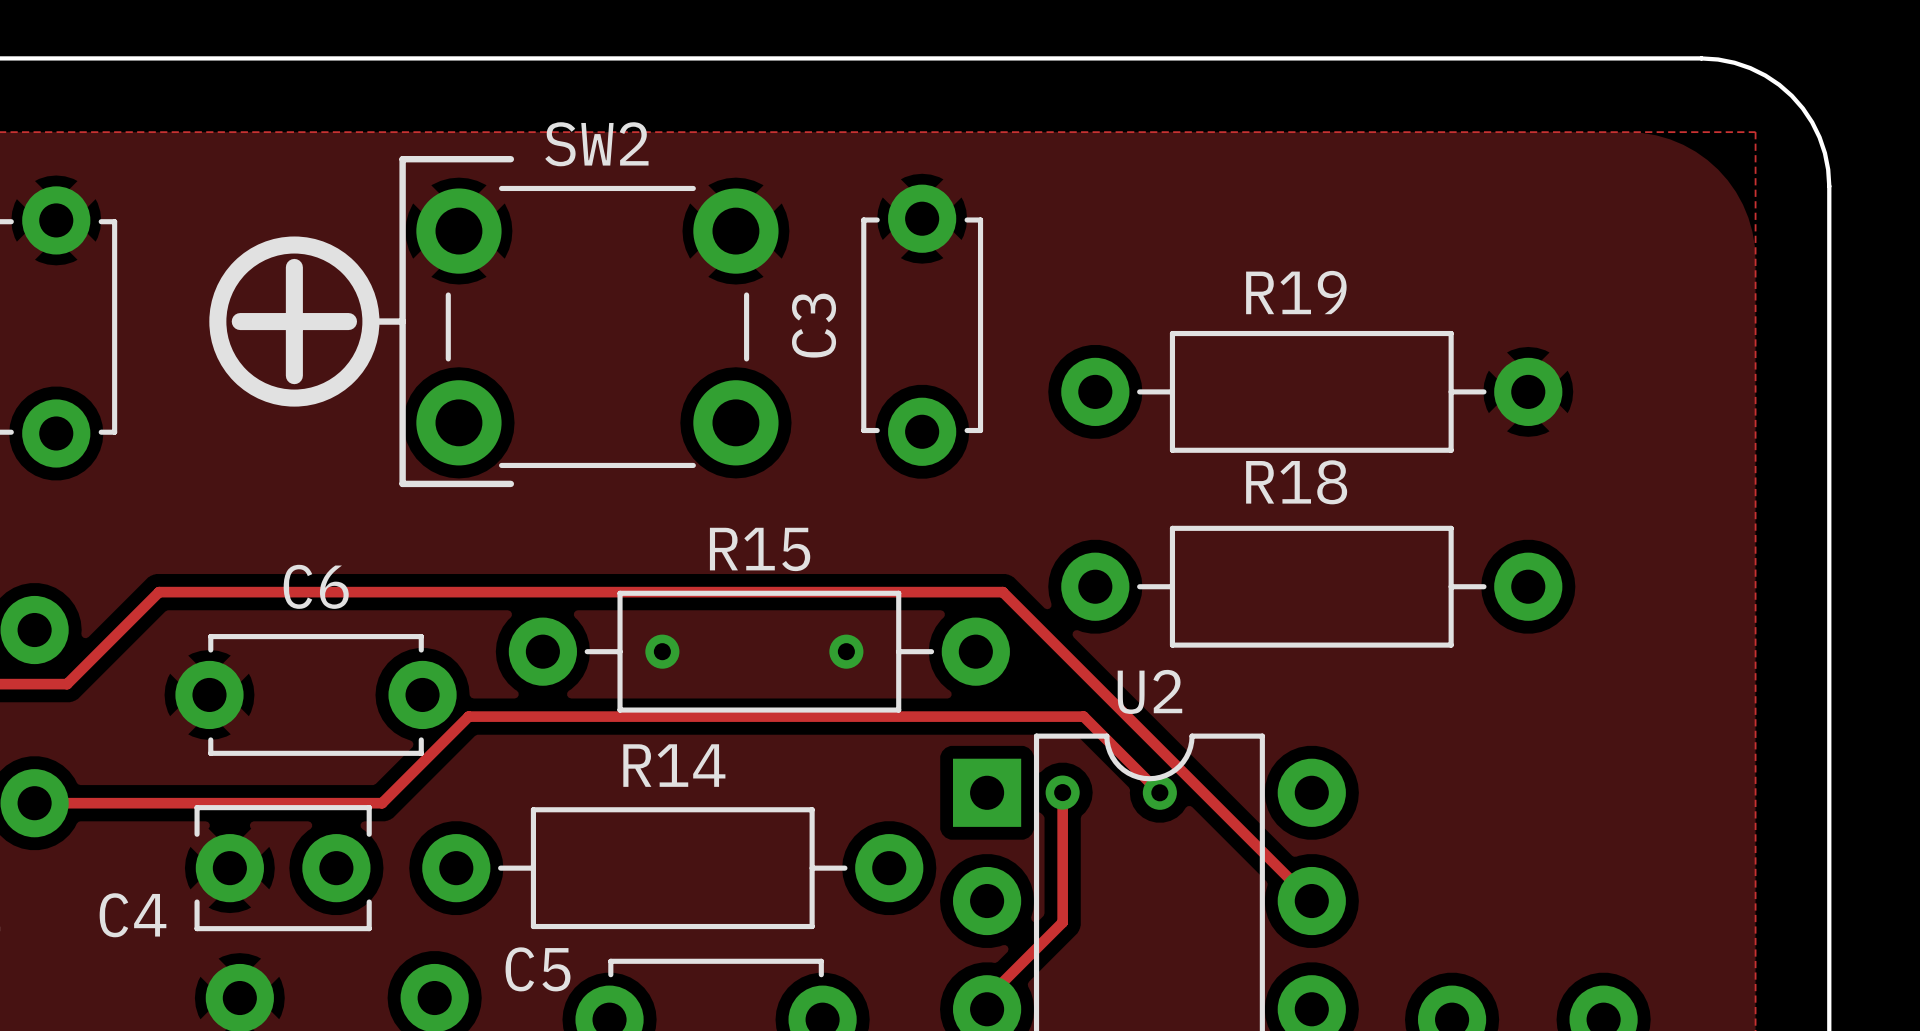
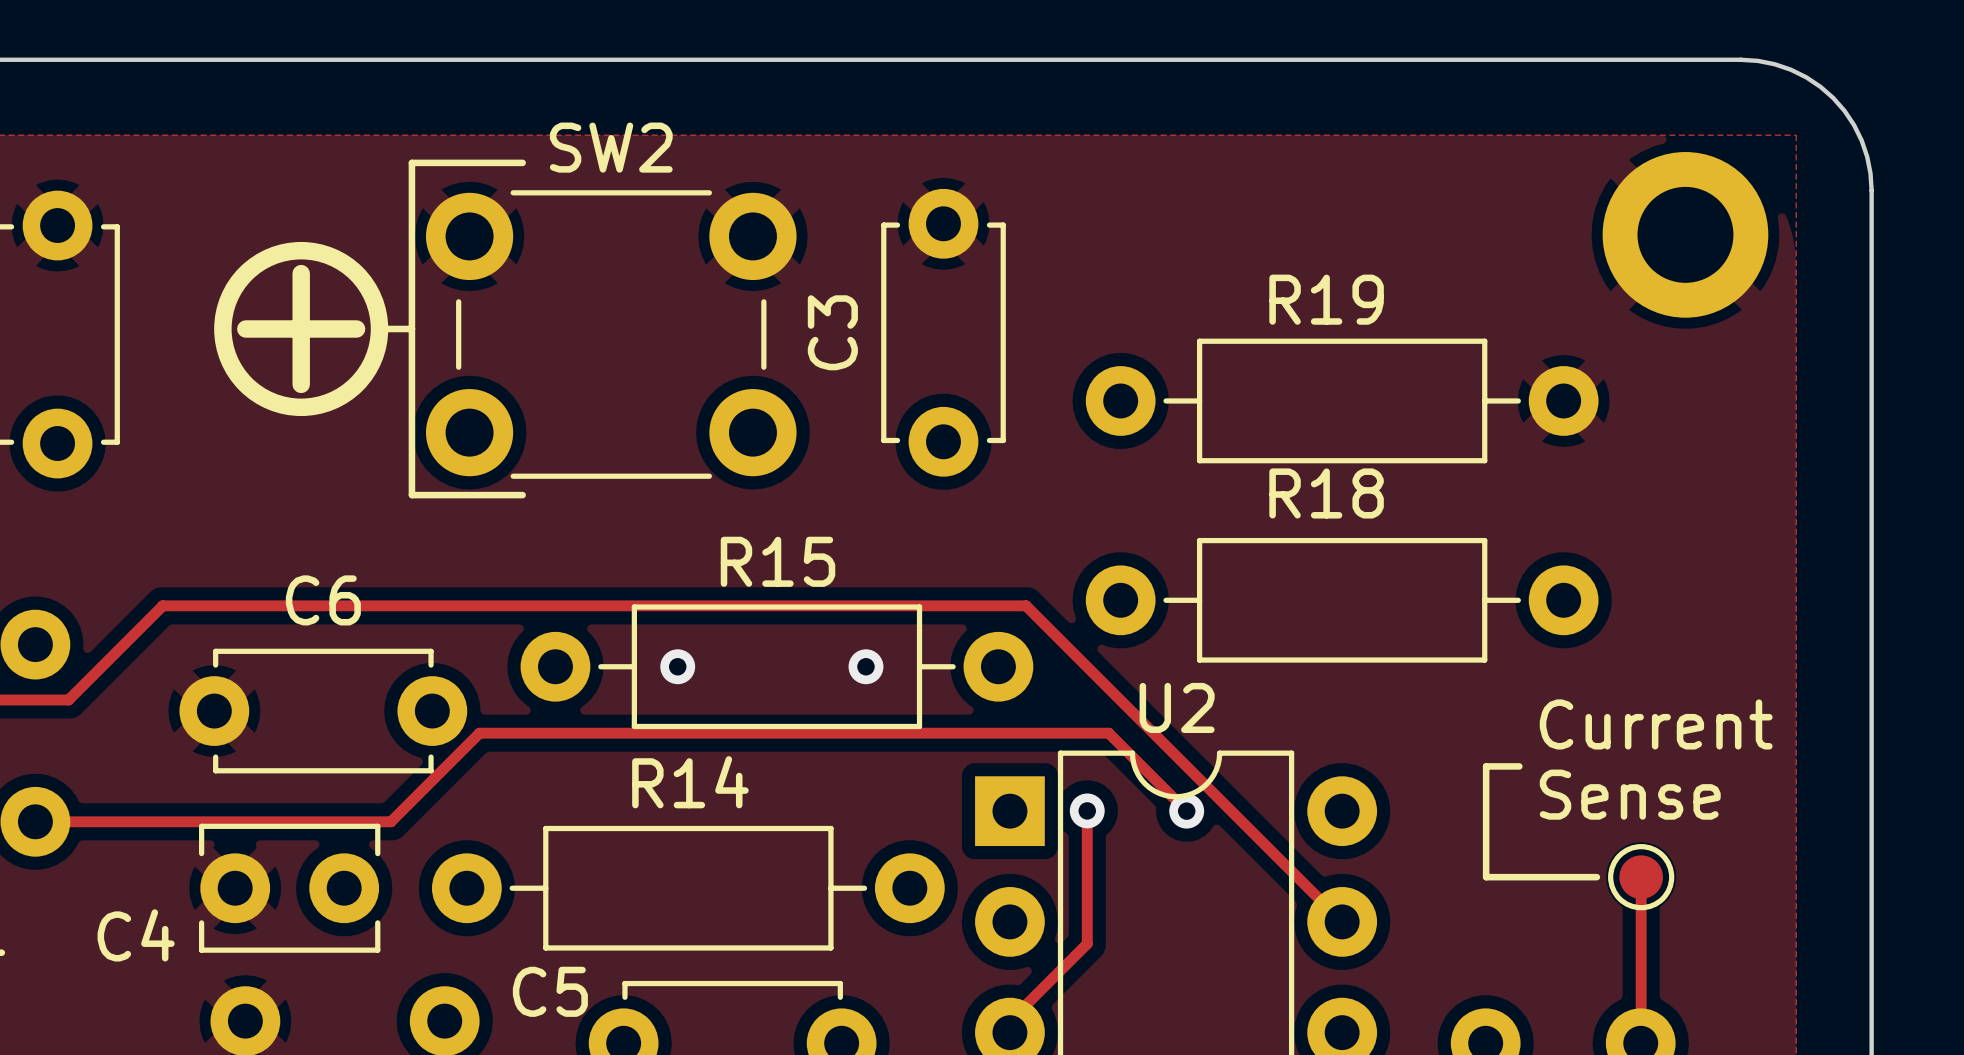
part: none -> (1685, 234)
text: none -> Current (1656, 724)
line: none -> (1519, 766) (1486, 766) (1486, 877) (1596, 877)
text: none -> Sense (1630, 794)
track: none -> (1641, 877) (1641, 1042)
part: none -> (1641, 877)

